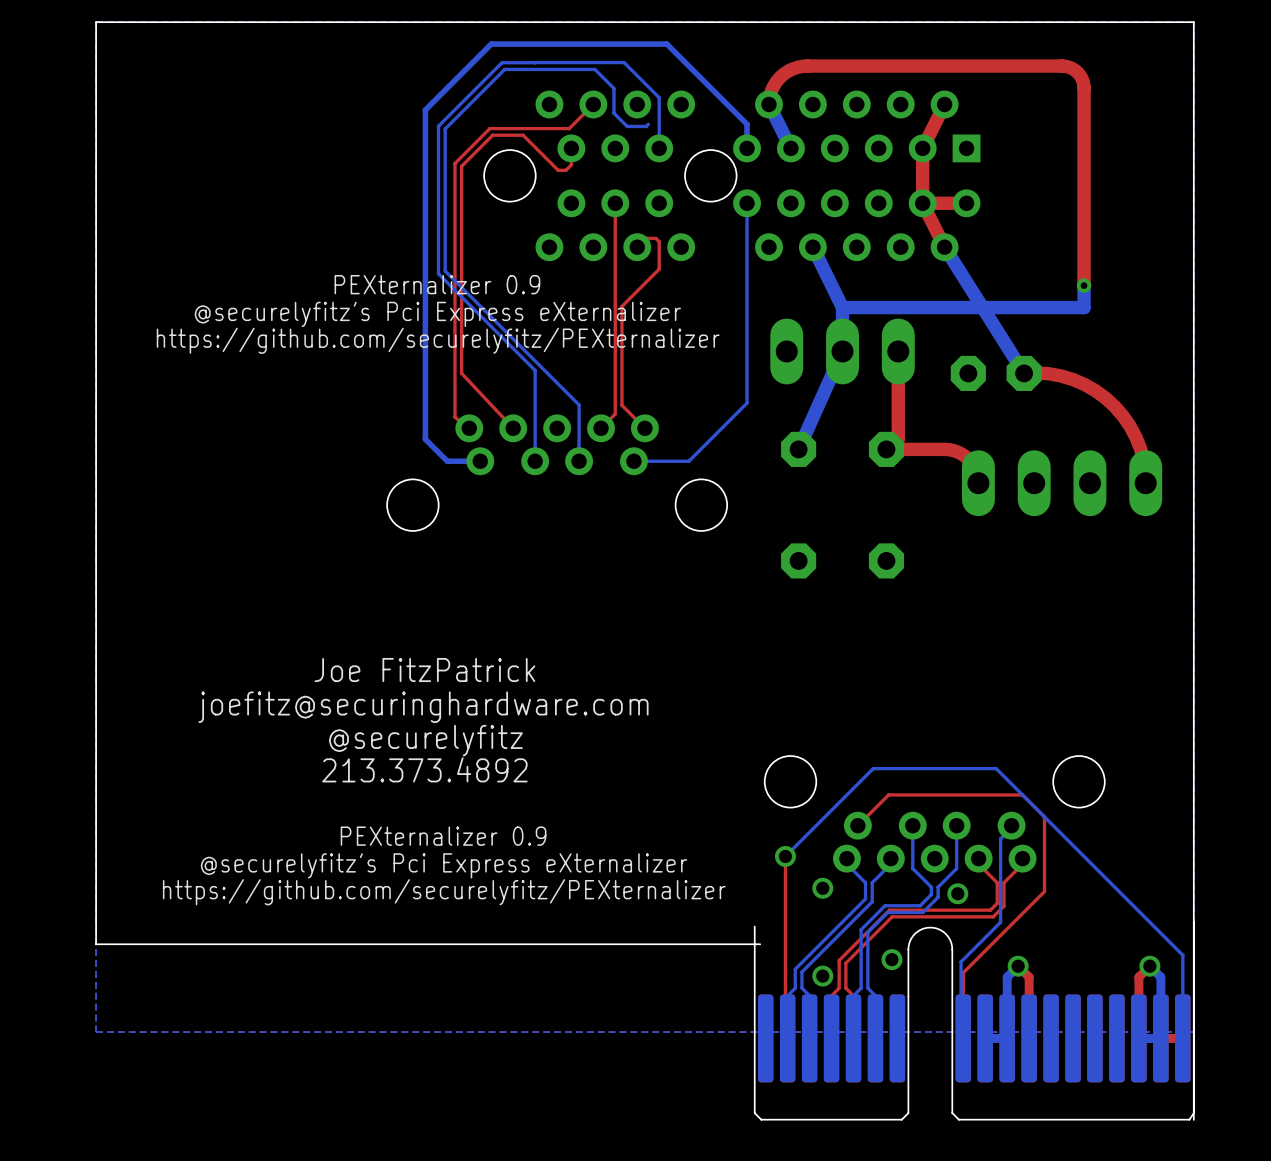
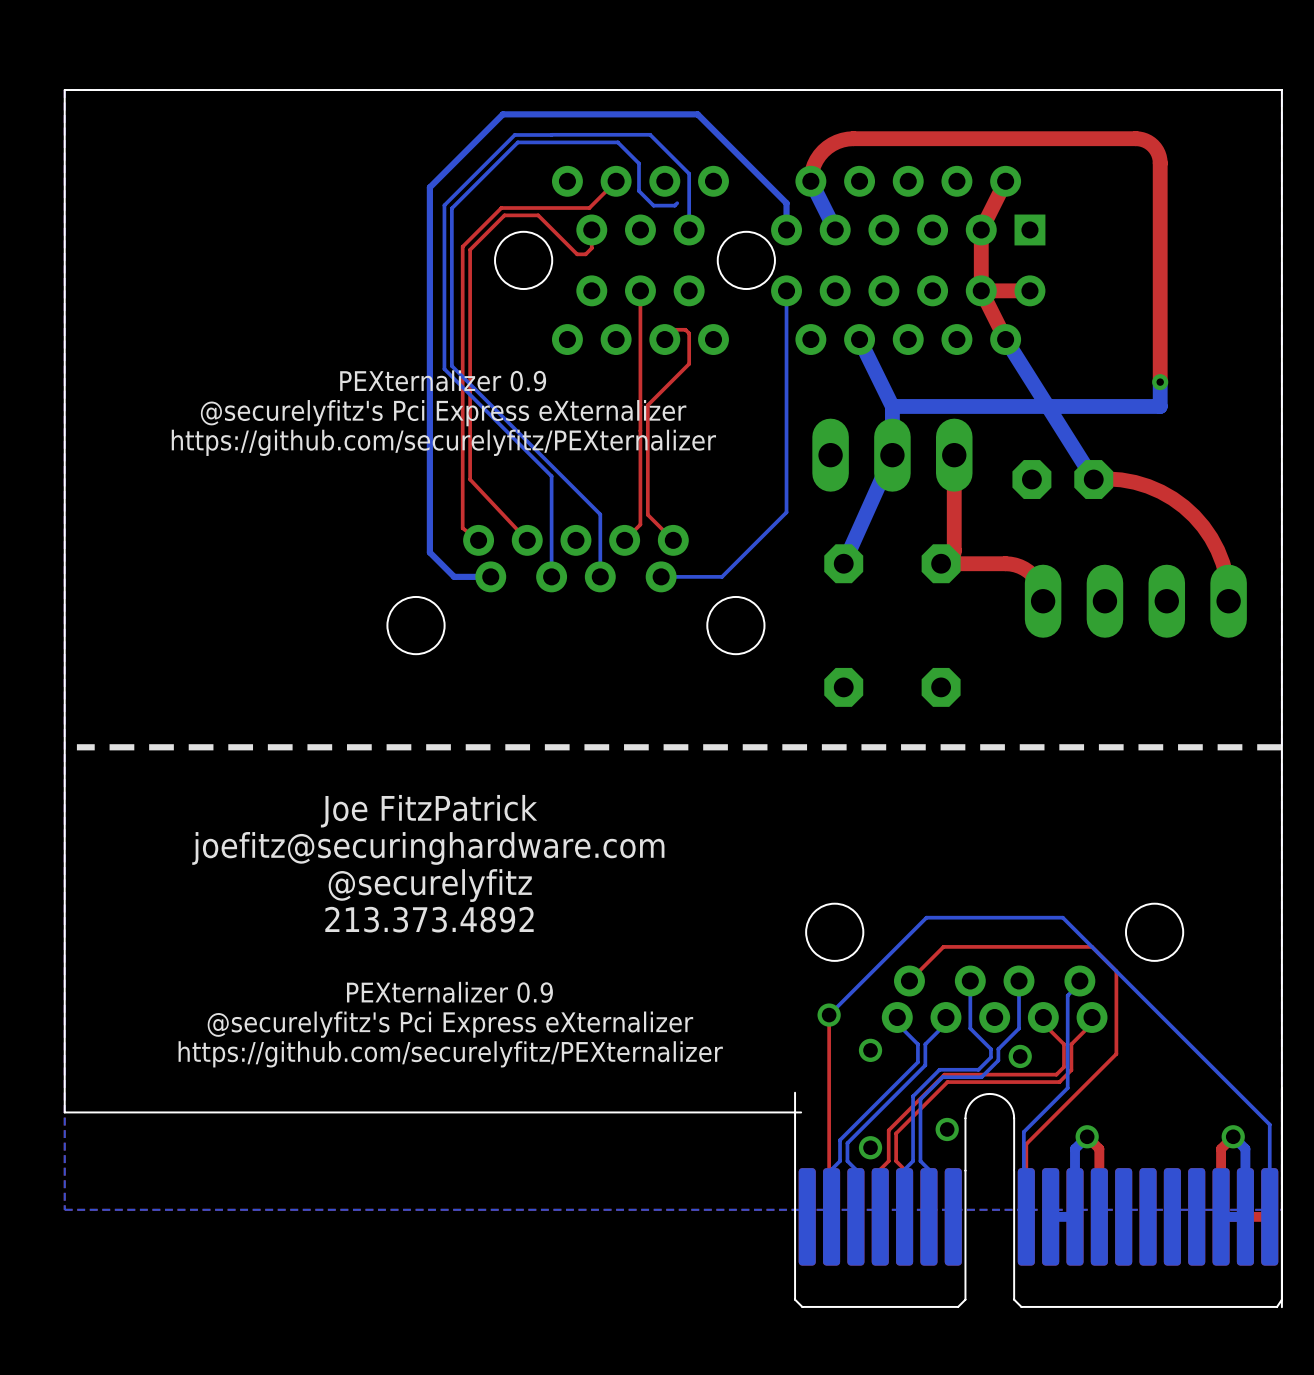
line: none -> (1281, 747) (76, 747)

